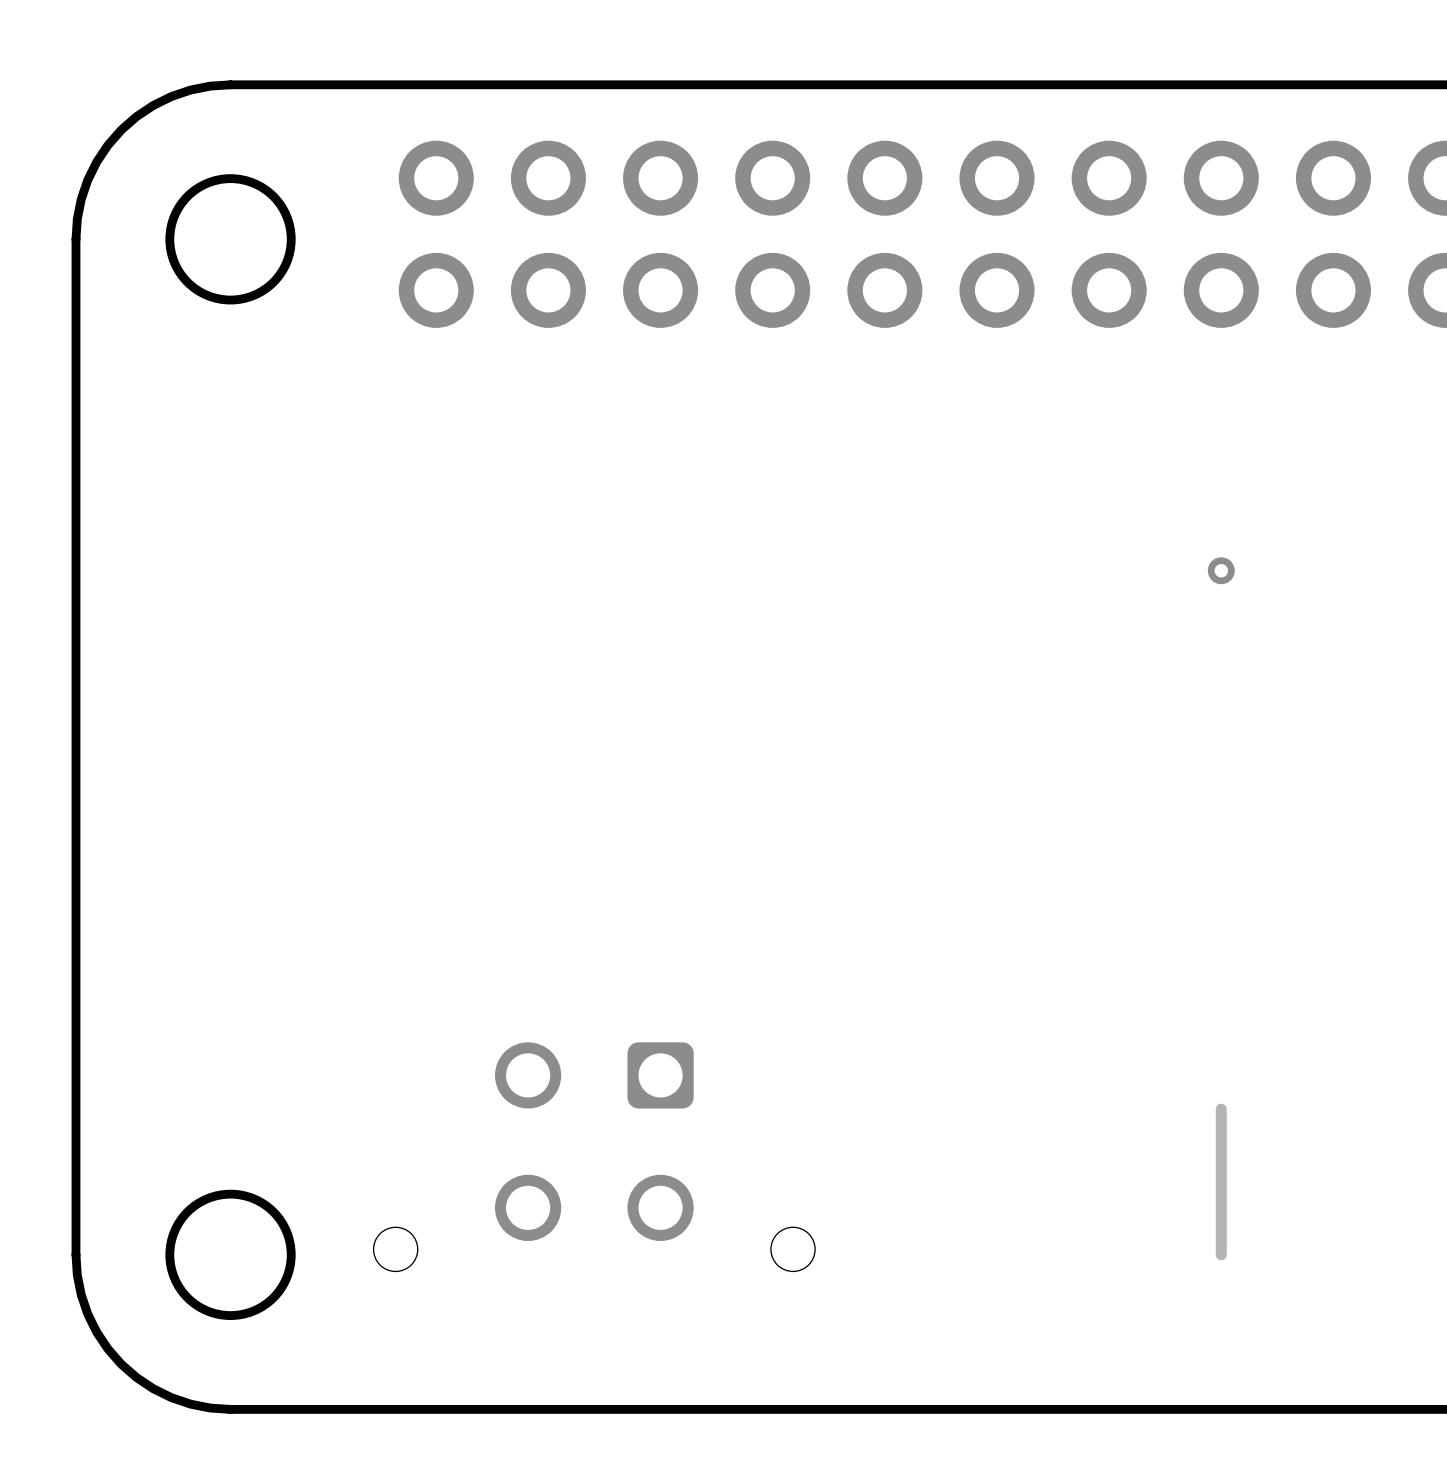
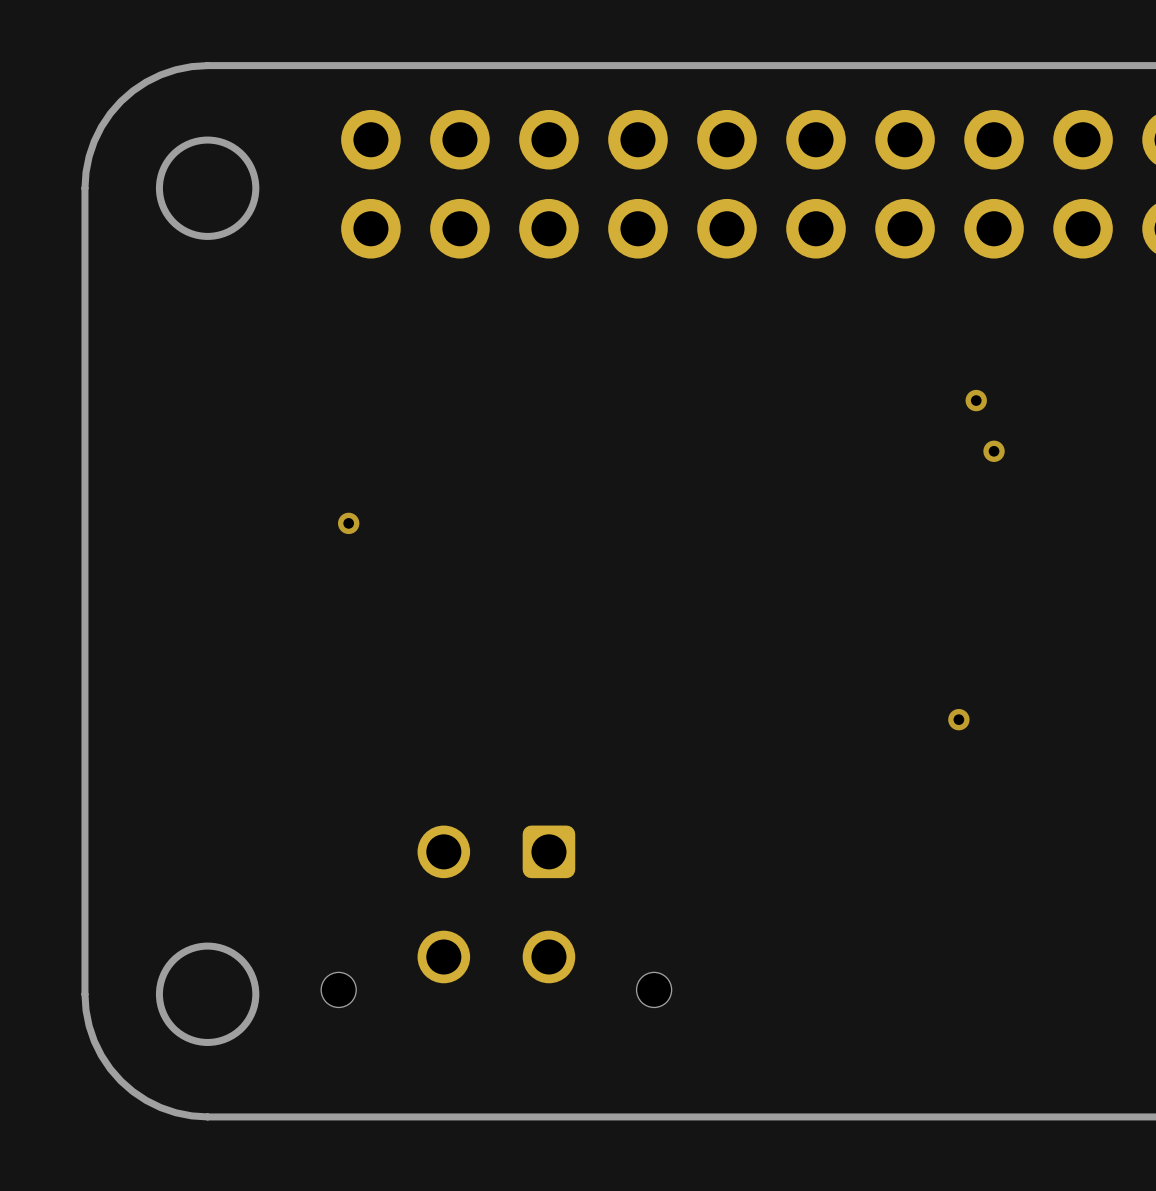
via: none -> (976, 400)
via: none -> (348, 523)
via: none -> (958, 719)
track: (1221, 1109) (1221, 1254) -> none

